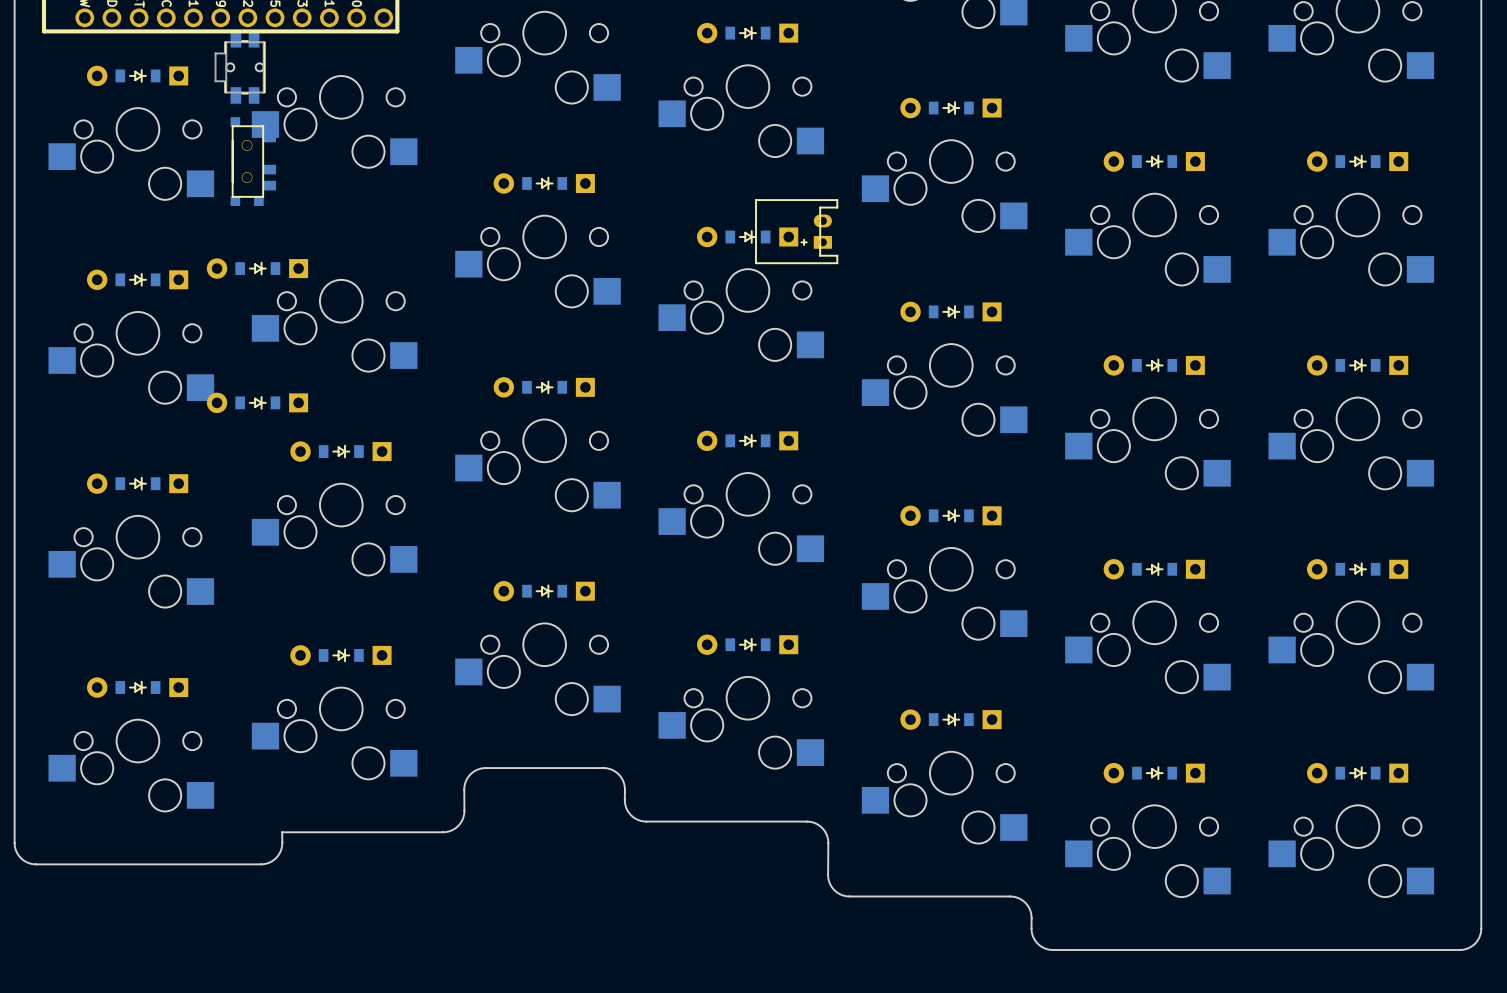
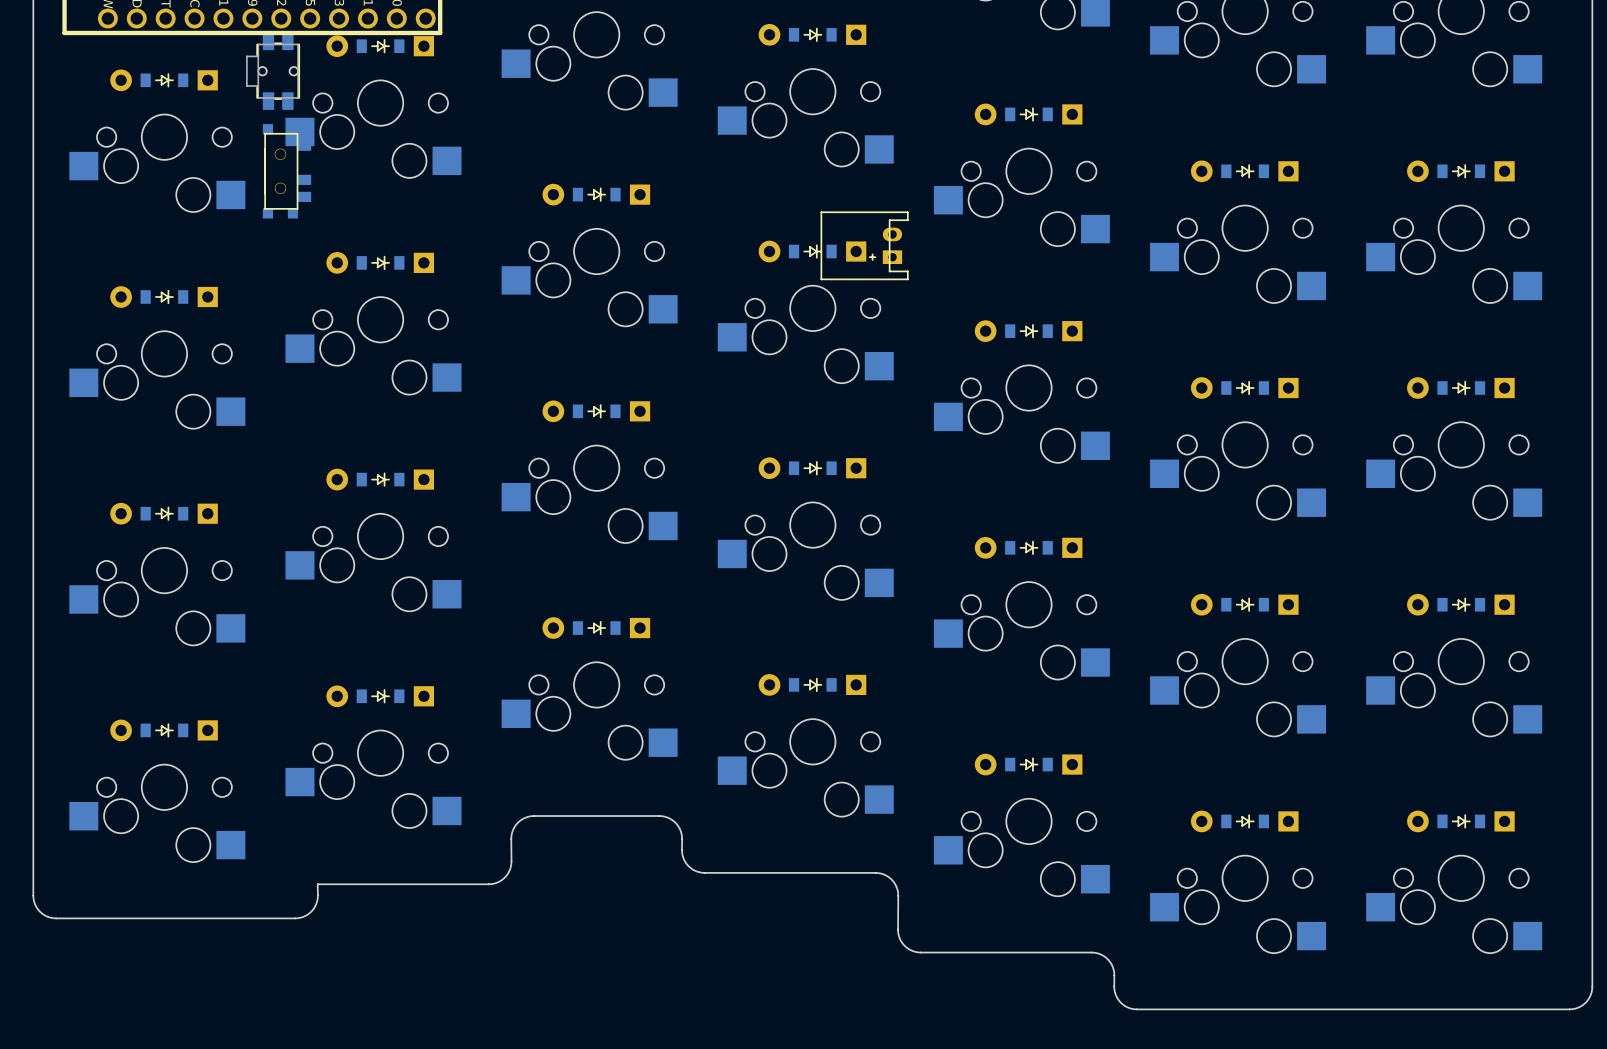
part: none -> (380, 46)
part position: (257, 268) -> (380, 262)
part: (257, 402) -> none

